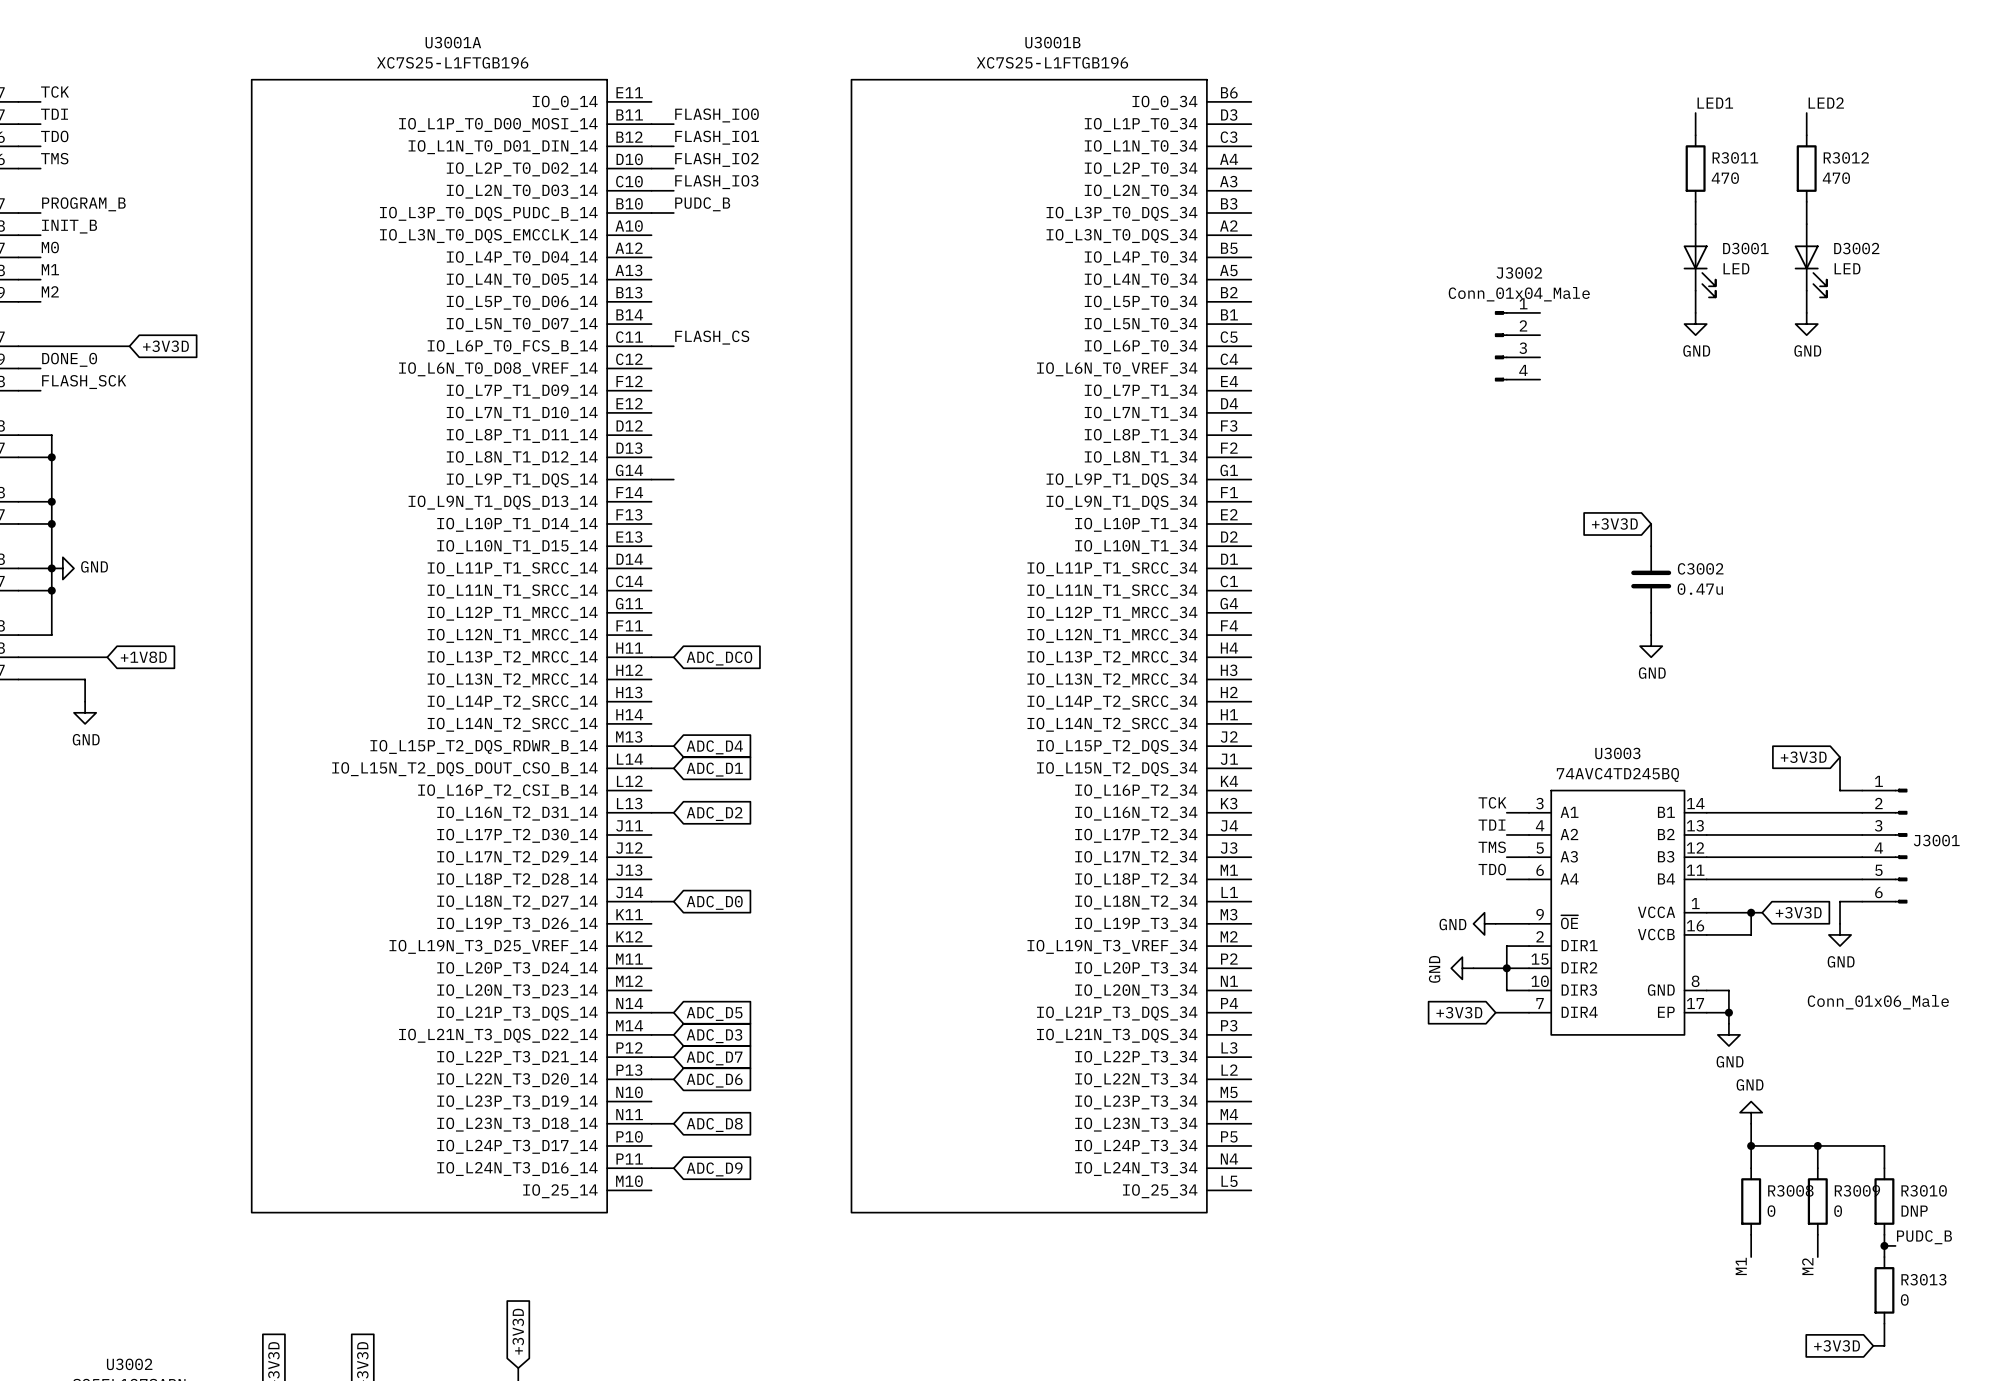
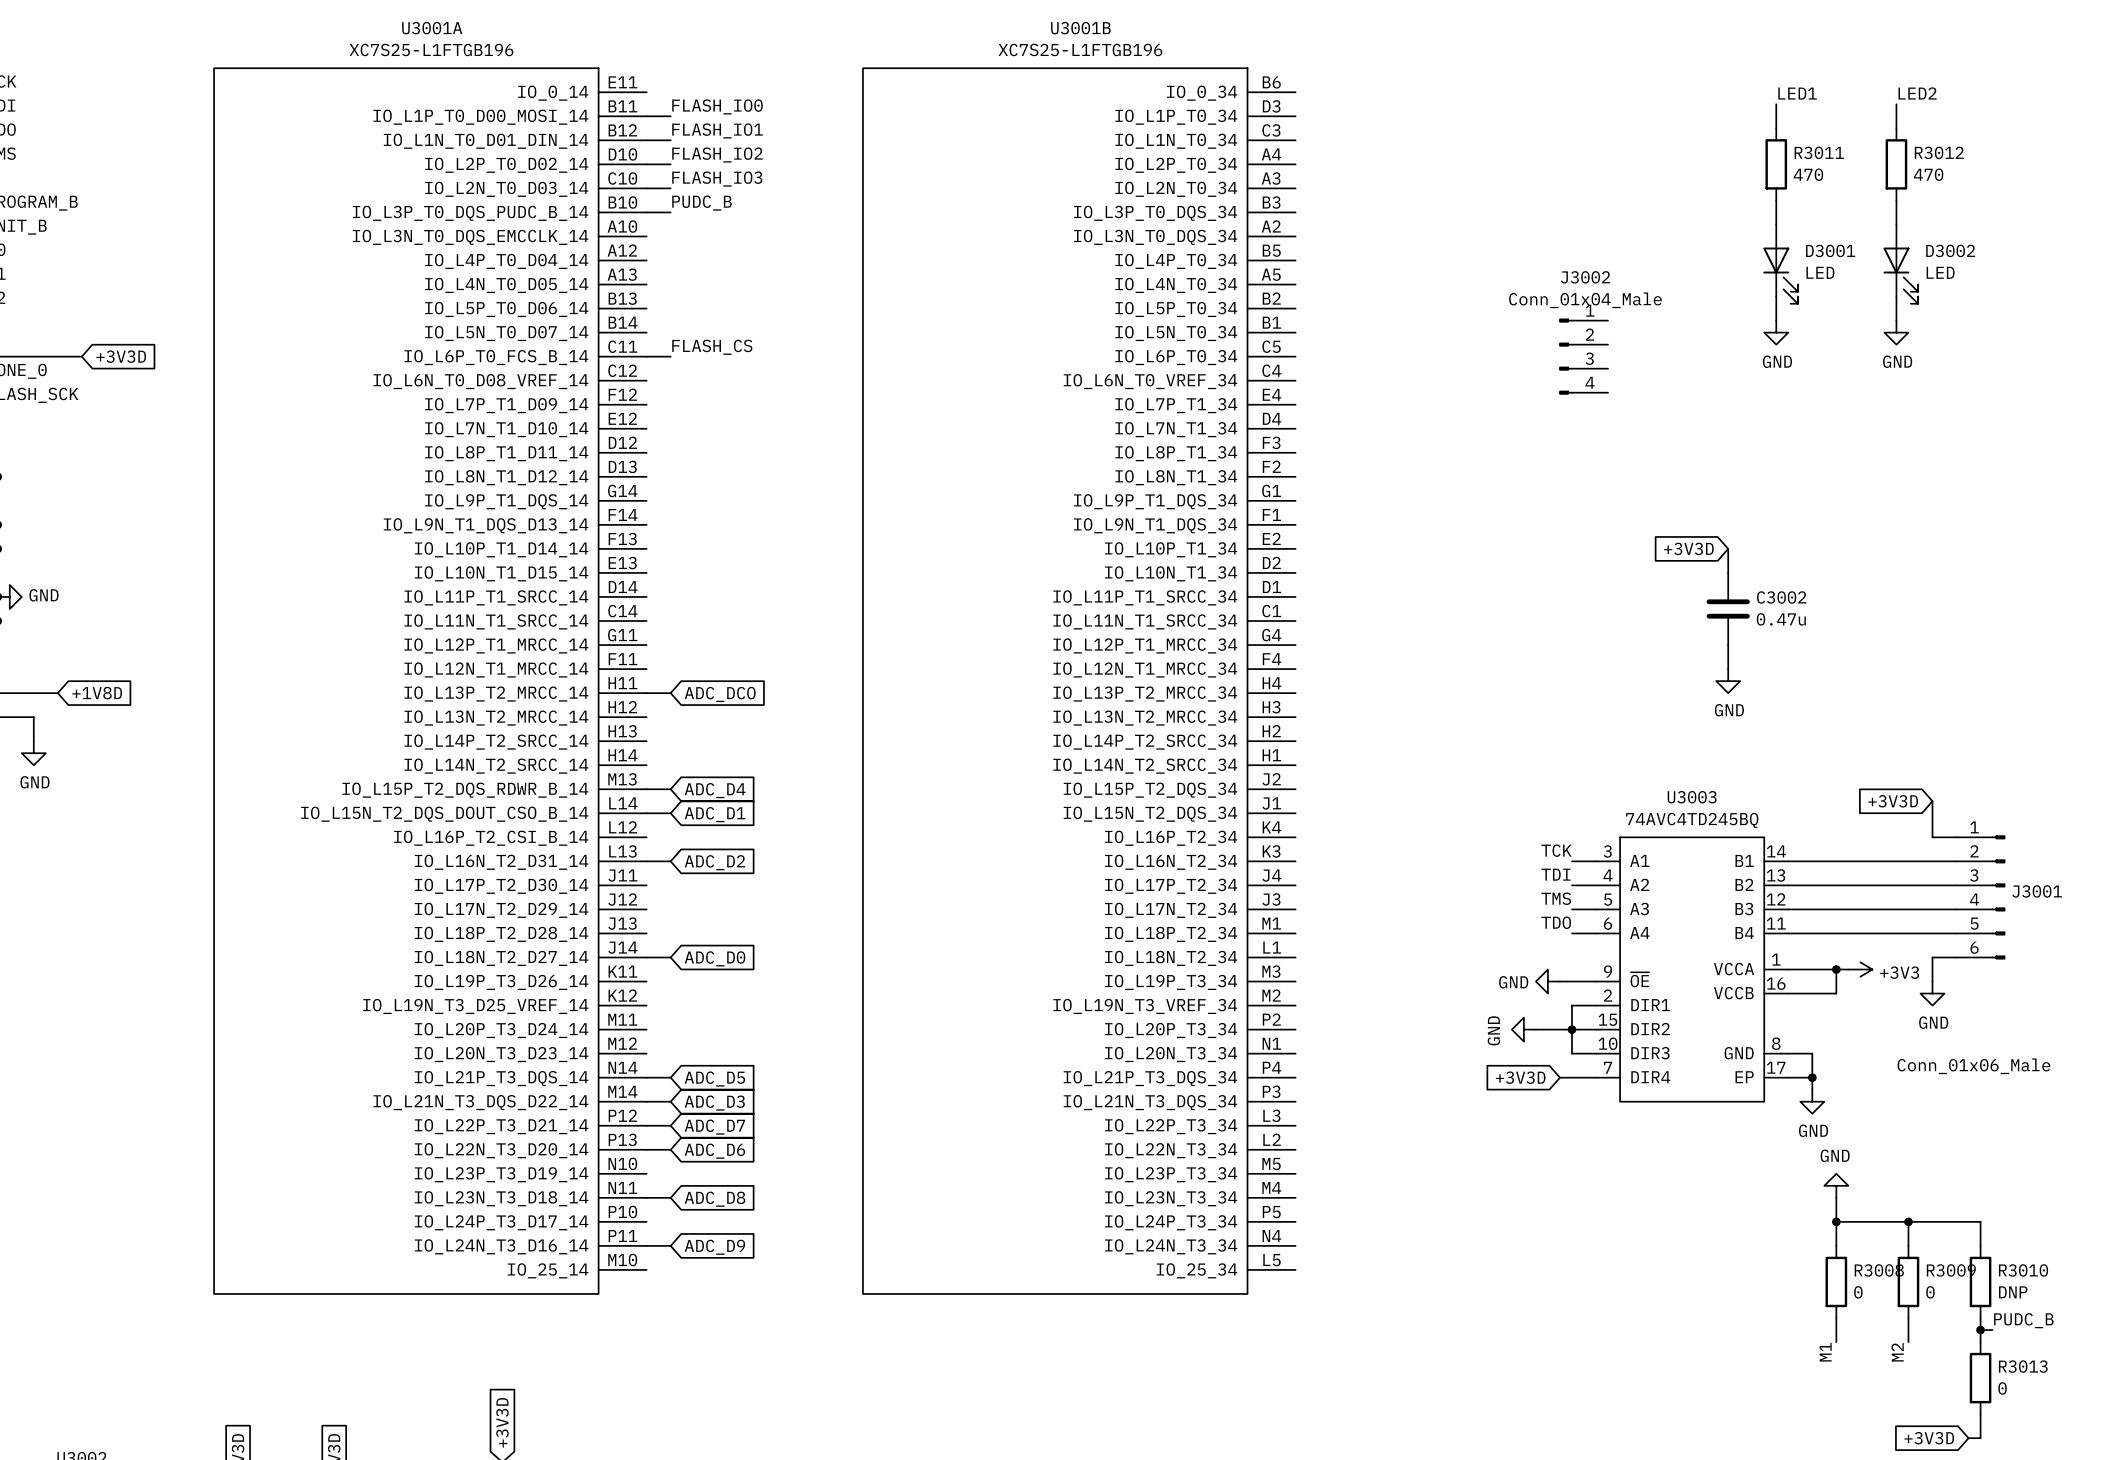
wire: (651, 479) (673, 479) -> none
power symbol: none -> +3V3 (1860, 969)
global label: +3V3D (1798, 912) -> none

